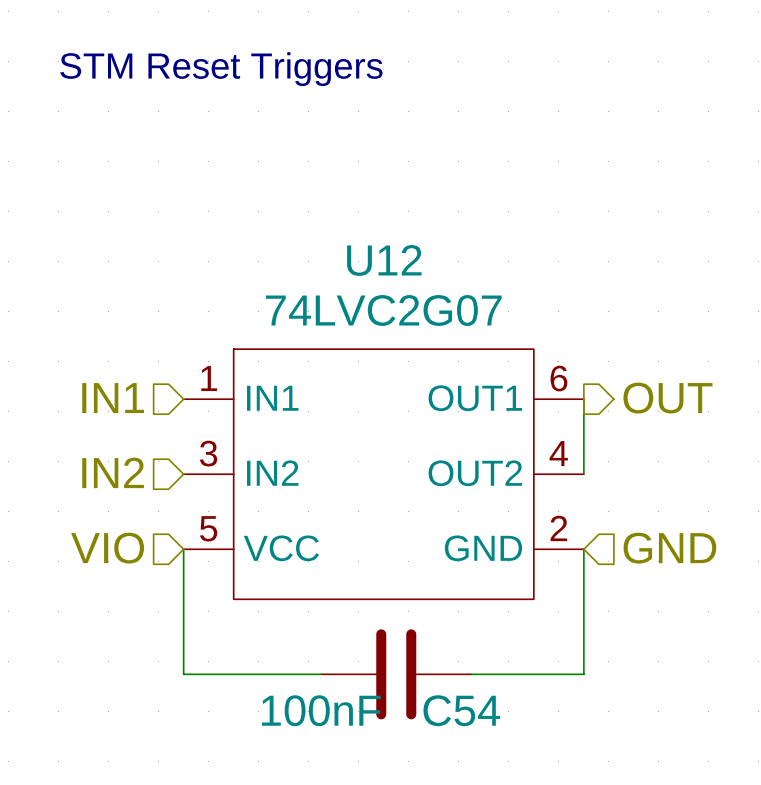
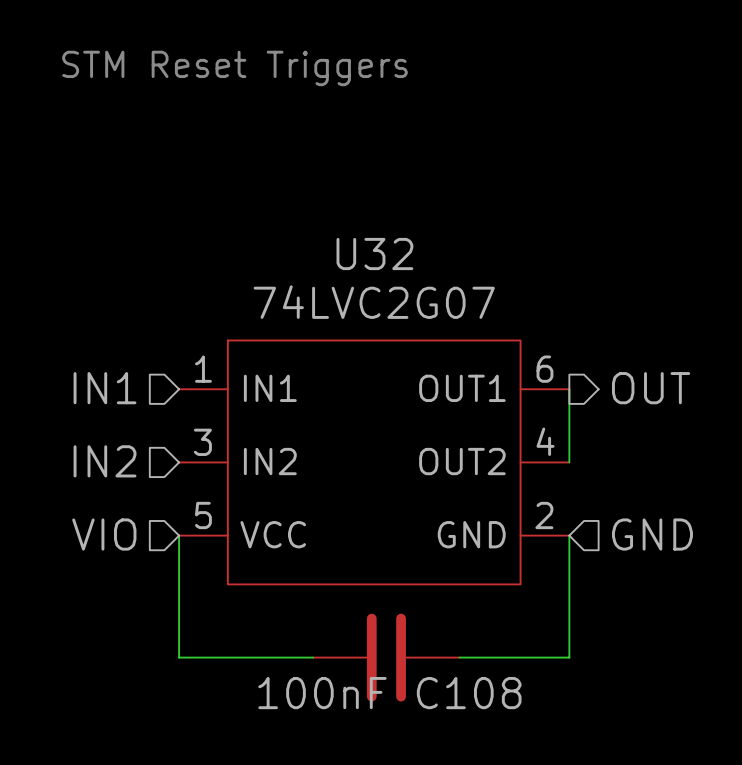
U12 name: U12 (384, 260) -> U32 (374, 254)
C54 name: C54 (461, 710) -> C108 (469, 693)

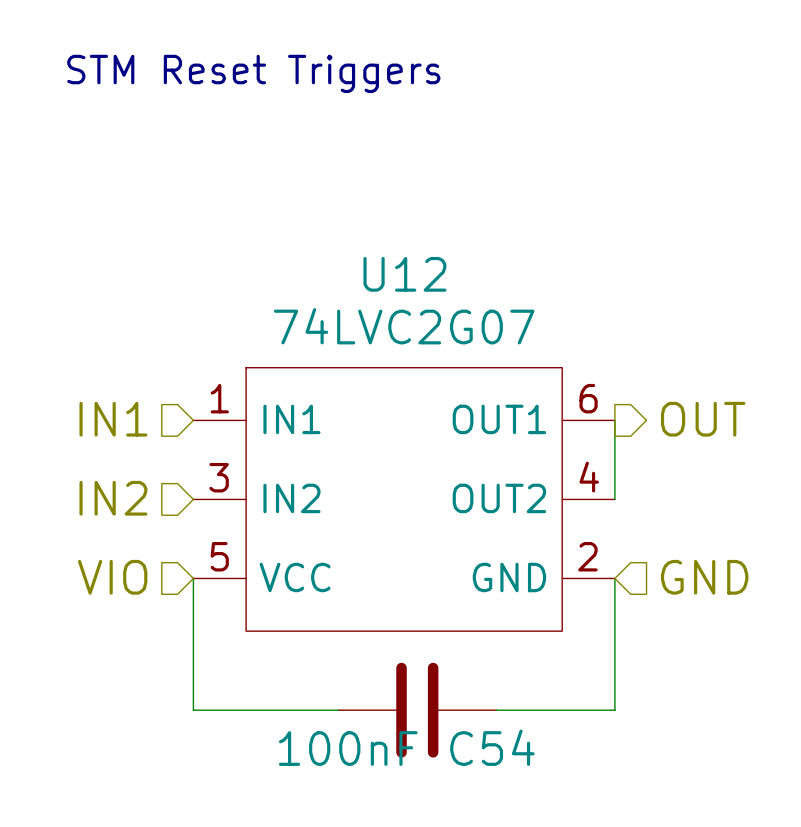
U32 name: U32 (374, 254) -> U12 (404, 274)
C108 name: C108 (469, 693) -> C54 (492, 747)

